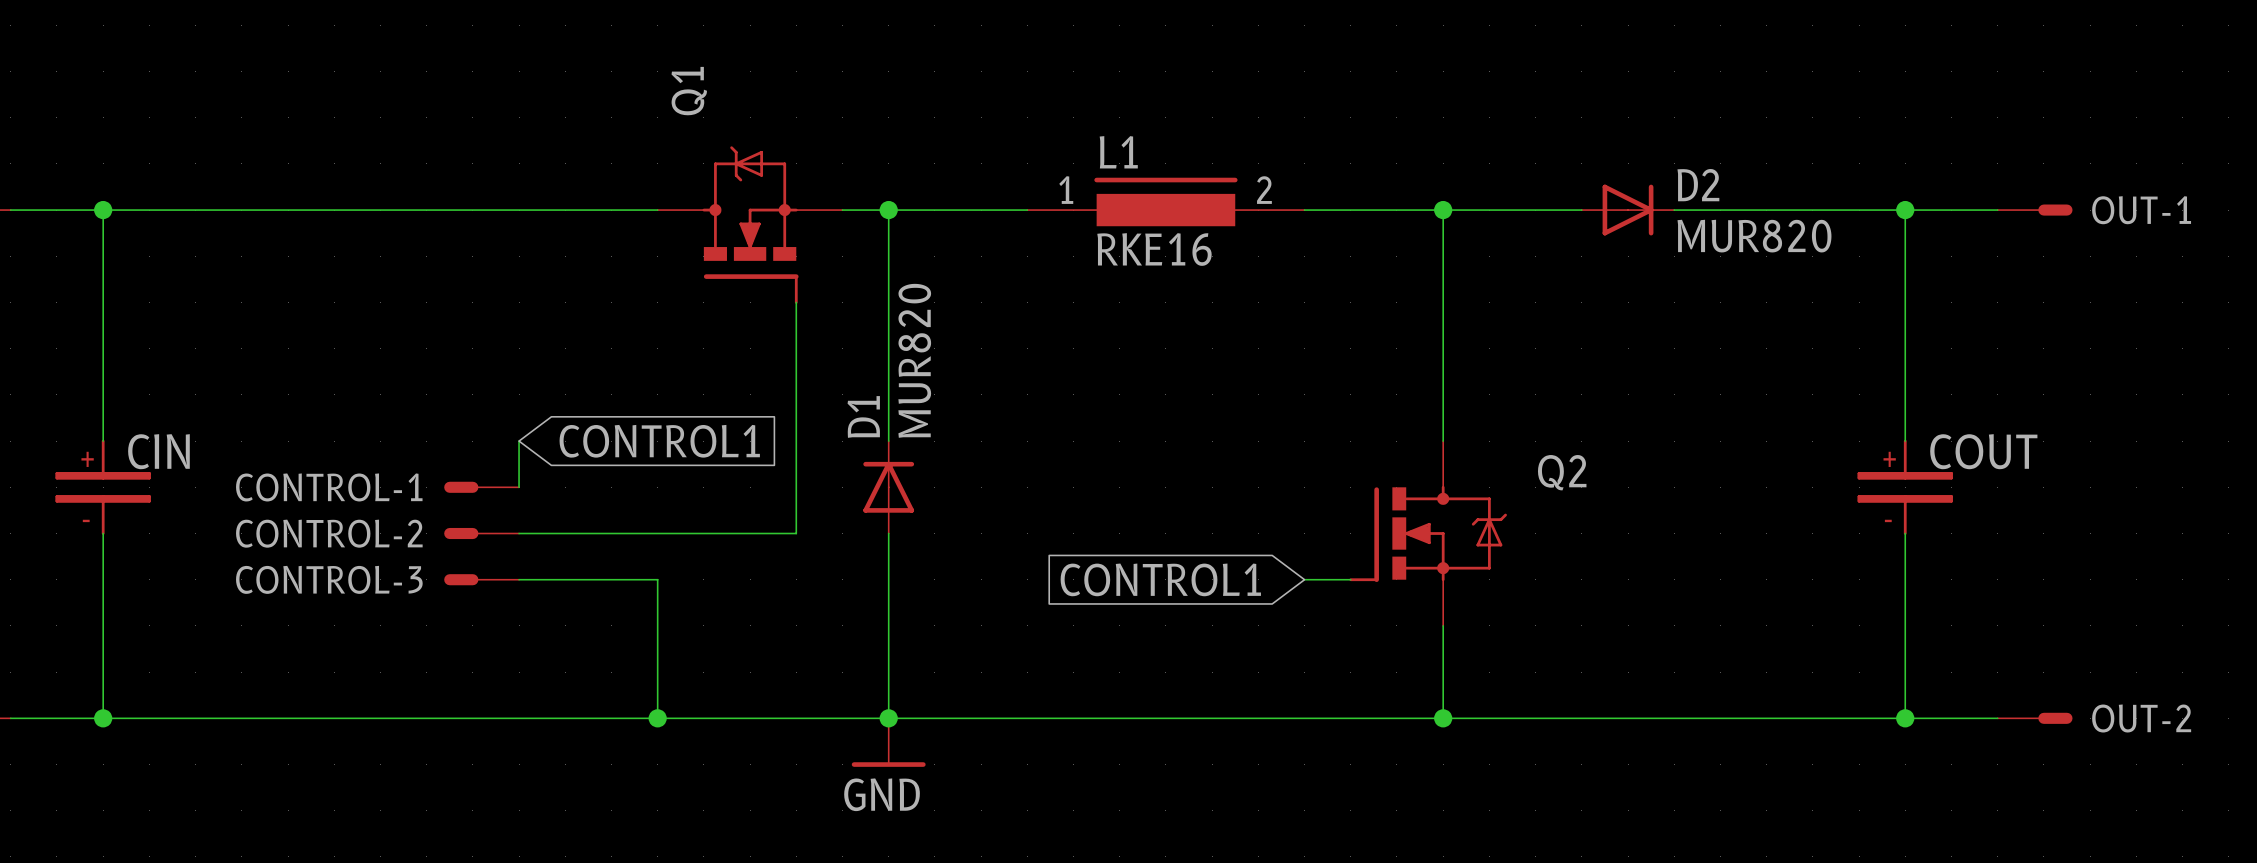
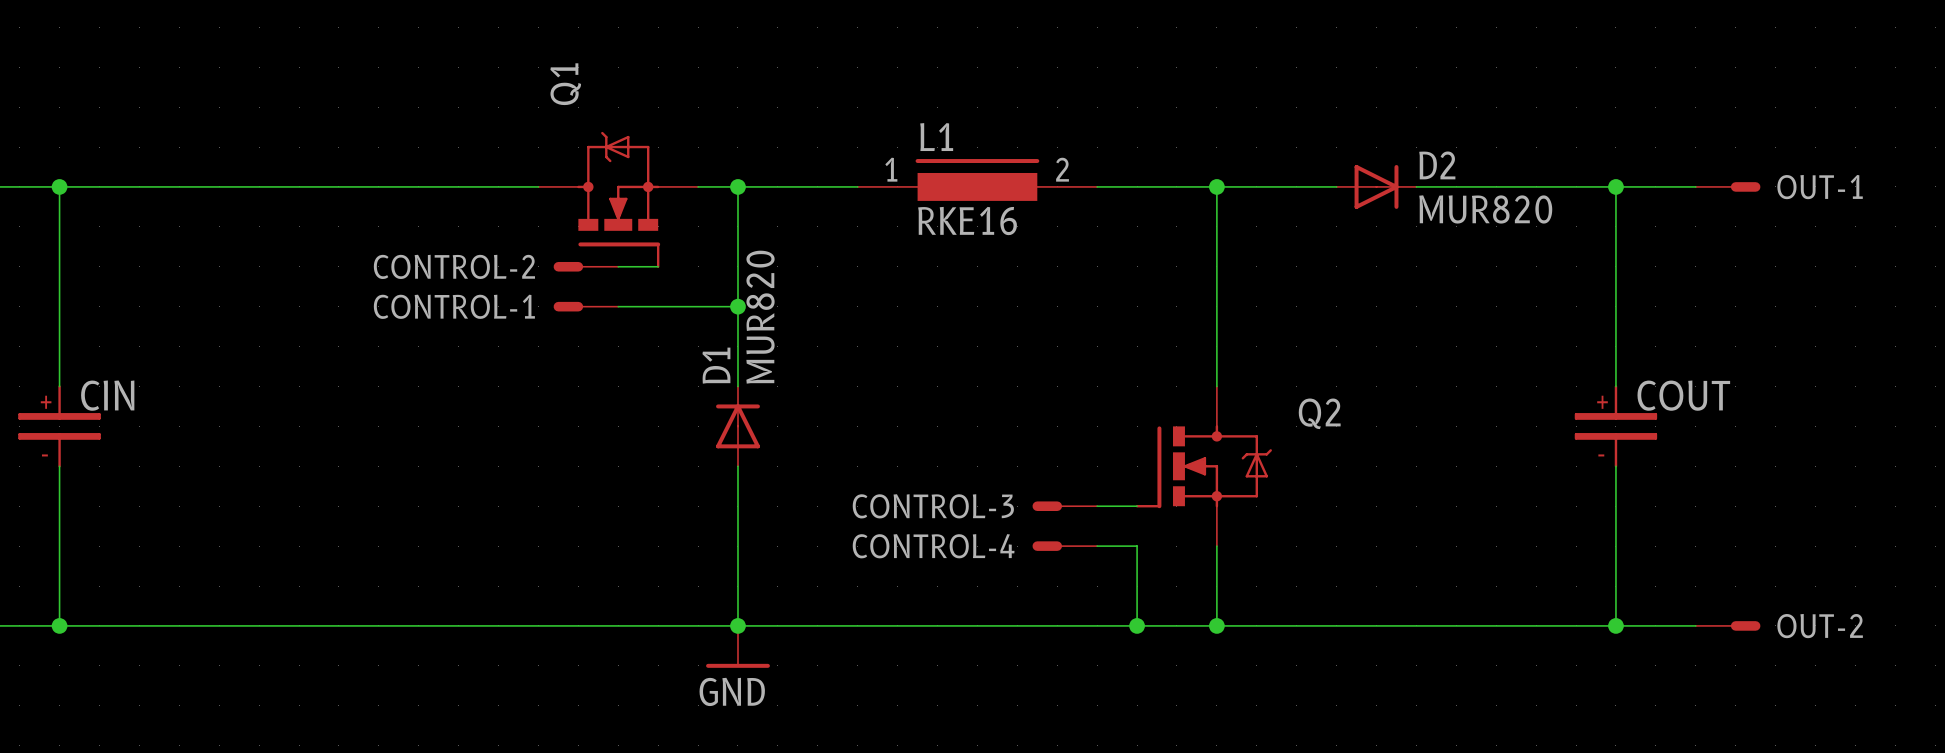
wire: (796, 302) (796, 533) (519, 533) -> (658, 266) (618, 266)
wire: none -> (618, 306) (737, 306)
junction: none -> (737, 306)
wire: (519, 441) (519, 487) -> none
global label: CONTROL1 (659, 441) -> none
CONTROL-1 position: (481, 487) -> (585, 306)
CONTROL-2 position: (481, 533) -> (585, 266)
CONTROL-3 position: (481, 579) -> (1064, 506)
wire: (519, 579) (657, 579) (657, 718) -> none
global label: CONTROL1 (1160, 579) -> none
CONTROL-4: none -> (1064, 546)
wire: none -> (1097, 546) (1137, 546) (1137, 625)
junction: (657, 718) -> none
junction: none -> (1137, 625)

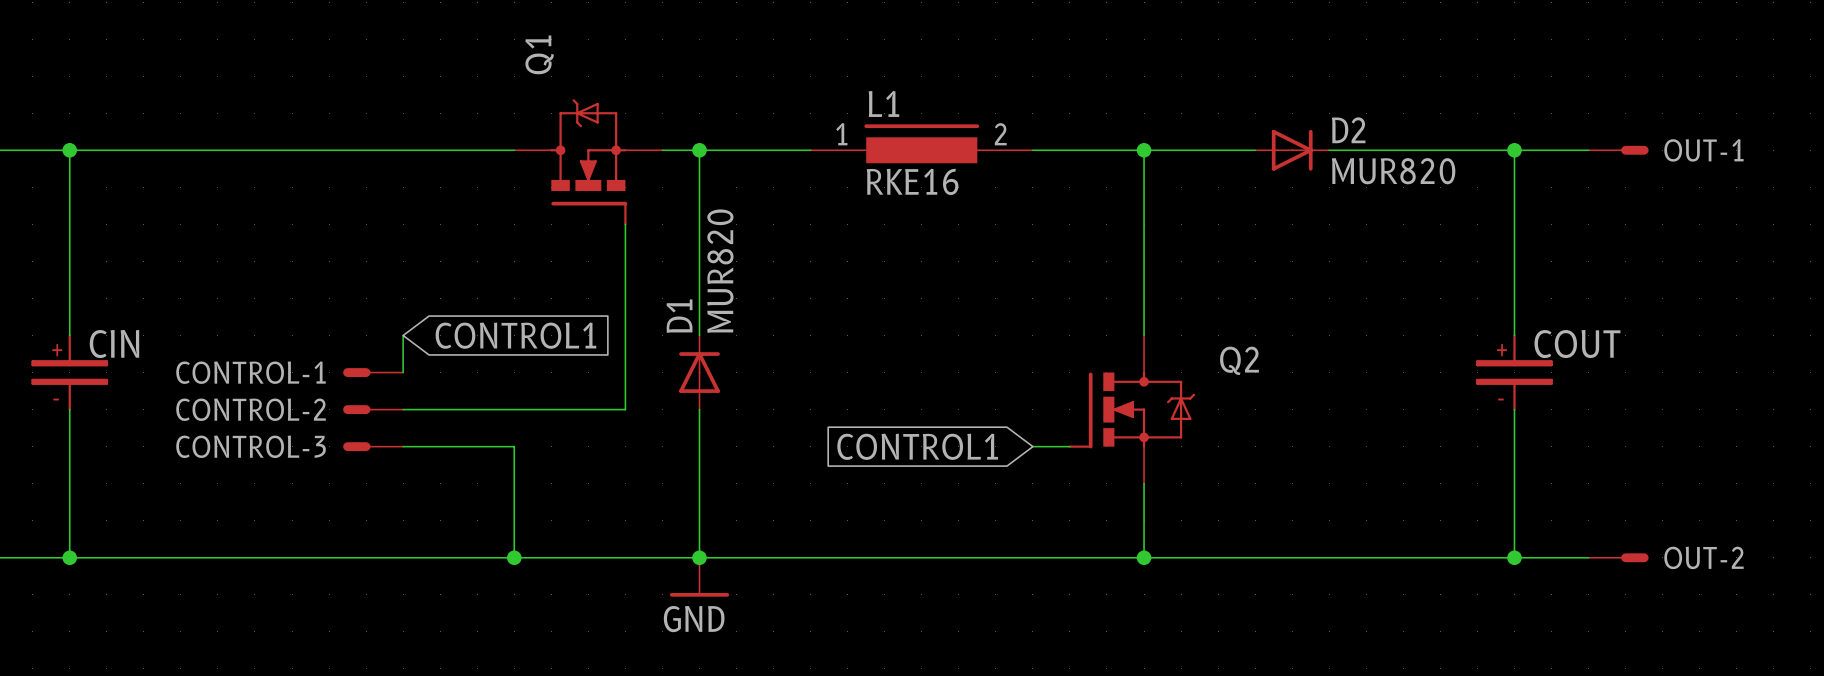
CONTROL-2 position: (585, 266) -> (373, 409)
wire: (618, 266) (658, 266) -> (403, 409) (625, 409) (625, 224)
CONTROL-1 position: (585, 306) -> (373, 372)
wire: (618, 306) (737, 306) -> none
junction: (737, 306) -> none
wire: none -> (403, 335) (403, 372)
global label: none -> CONTROL1 (515, 335)
wire: none -> (403, 446) (514, 446) (514, 557)
global label: none -> CONTROL1 (917, 446)
CONTROL-3 position: (1064, 506) -> (373, 446)
CONTROL-4: (1064, 546) -> none
wire: (1097, 546) (1137, 546) (1137, 625) -> none
junction: none -> (514, 557)
junction: (1137, 625) -> none

